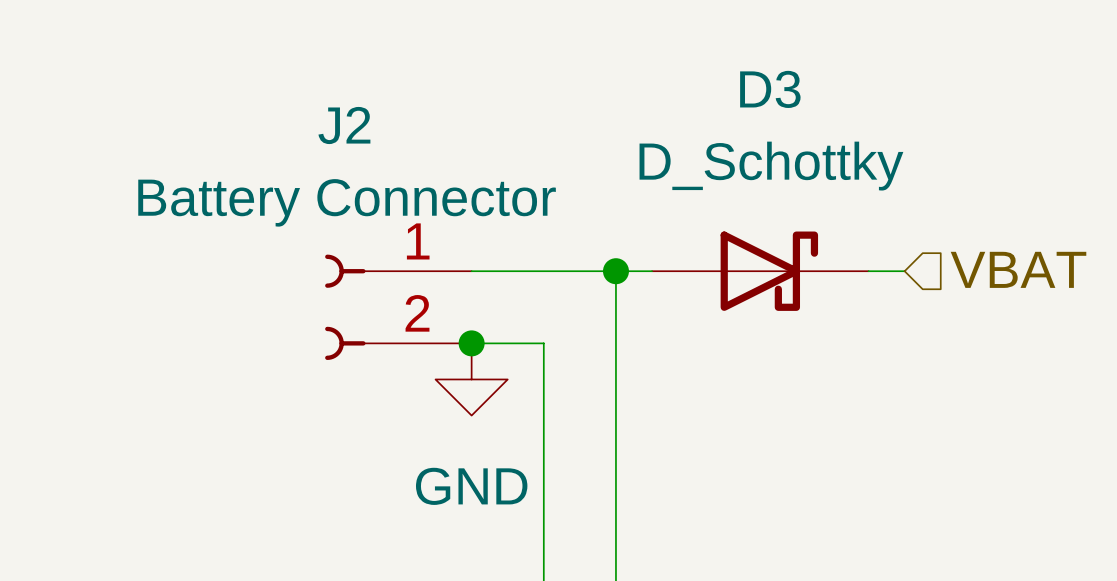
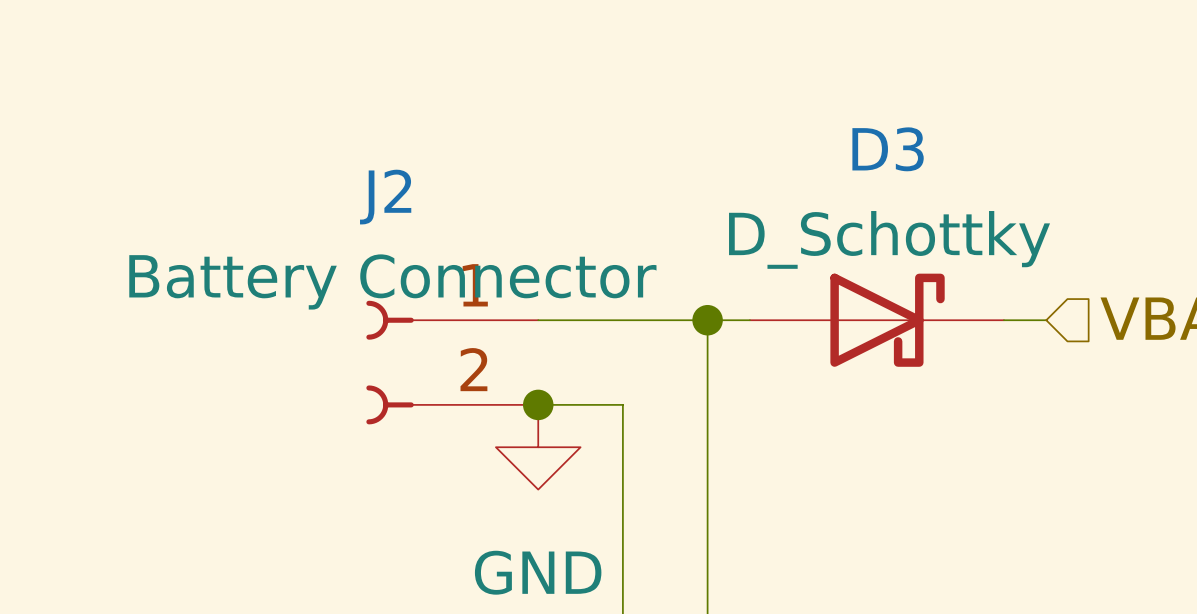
D3 name position: D3 (770, 89) -> D3 (888, 149)
J2 name position: J2 (344, 125) -> J2 (385, 197)
D3 value position: D_Schottky (771, 166) -> D_Schottky (889, 239)
J2 value position: Battery Connector (347, 202) -> Battery Connector (392, 281)

